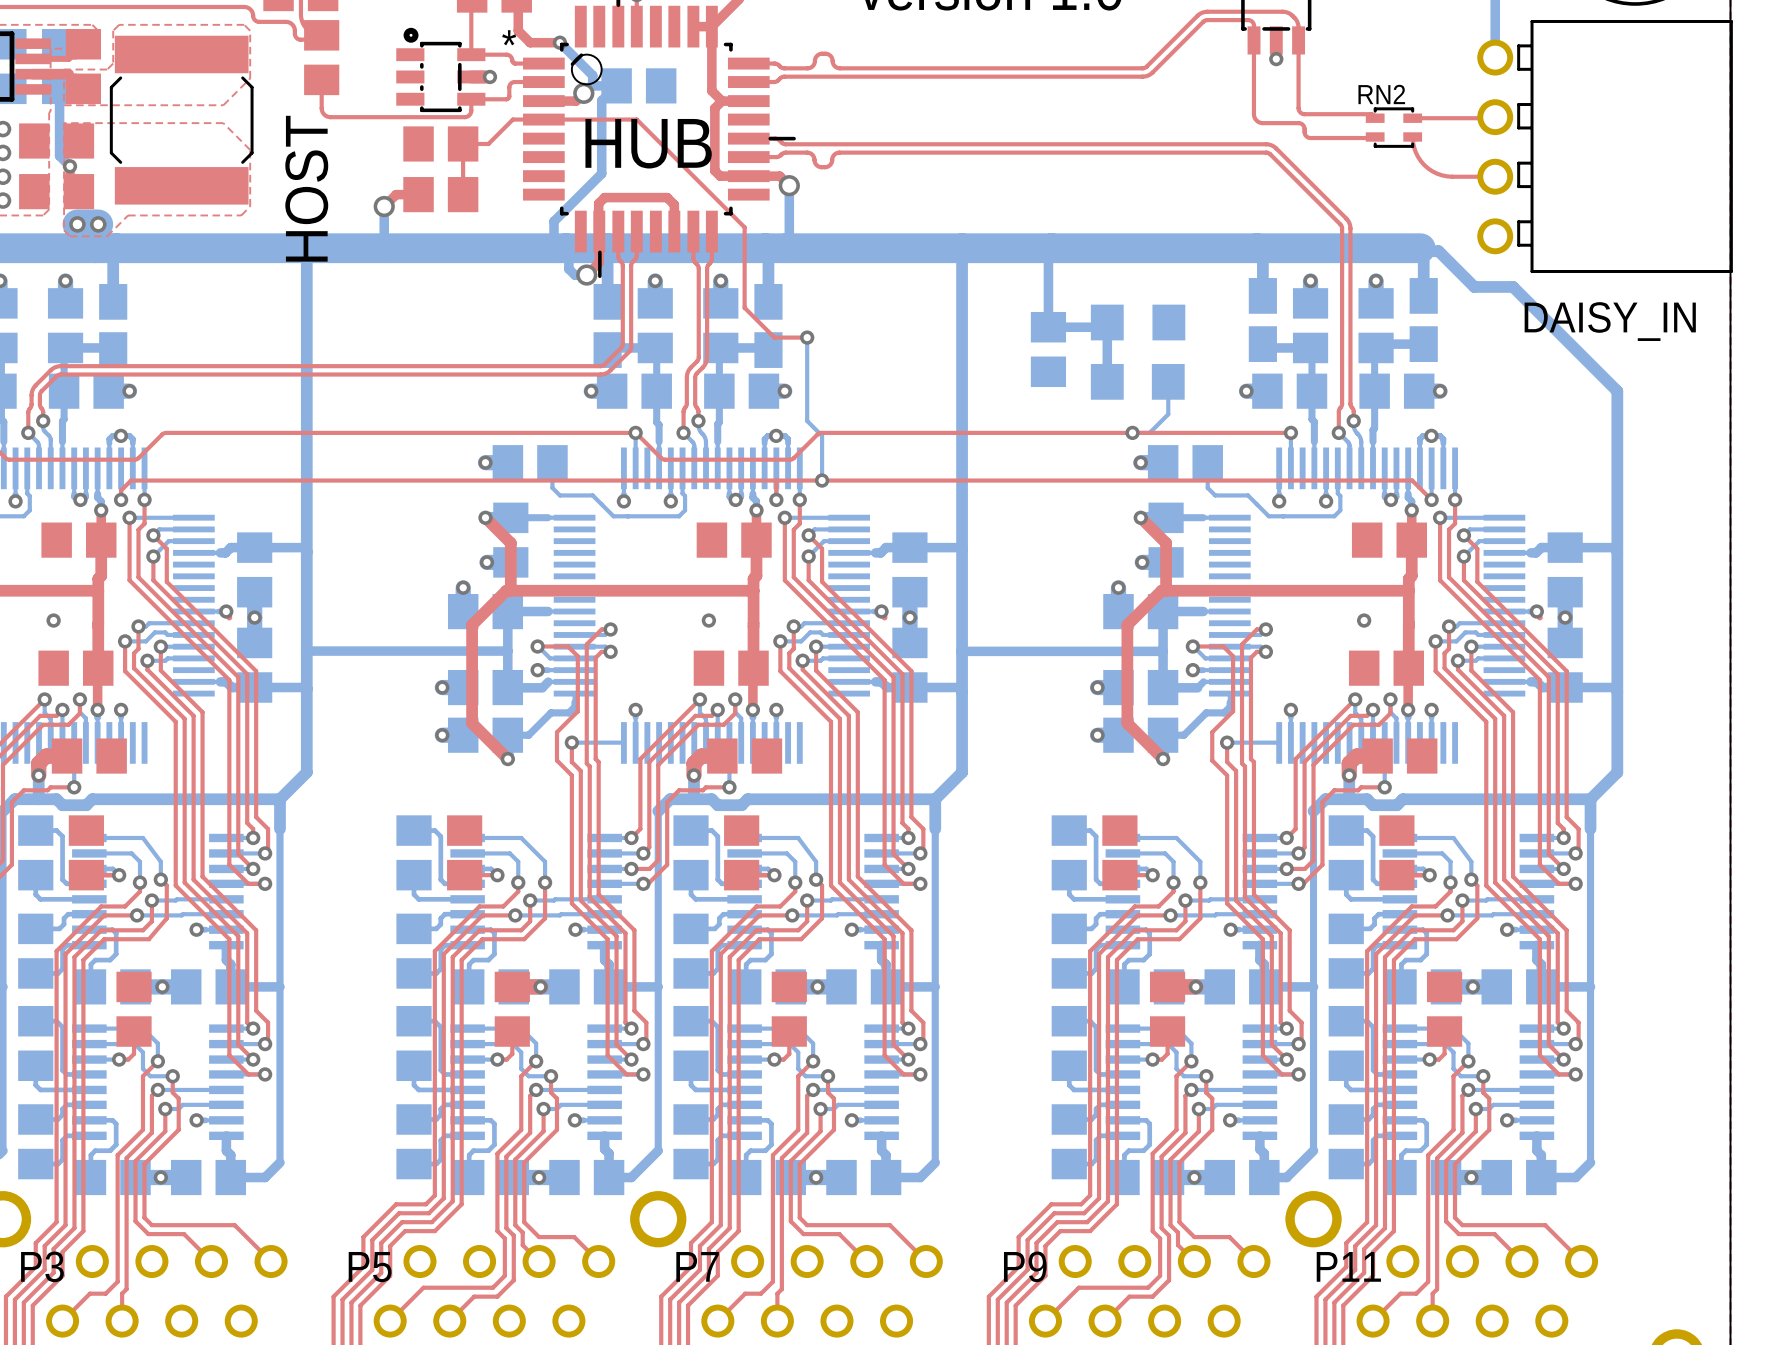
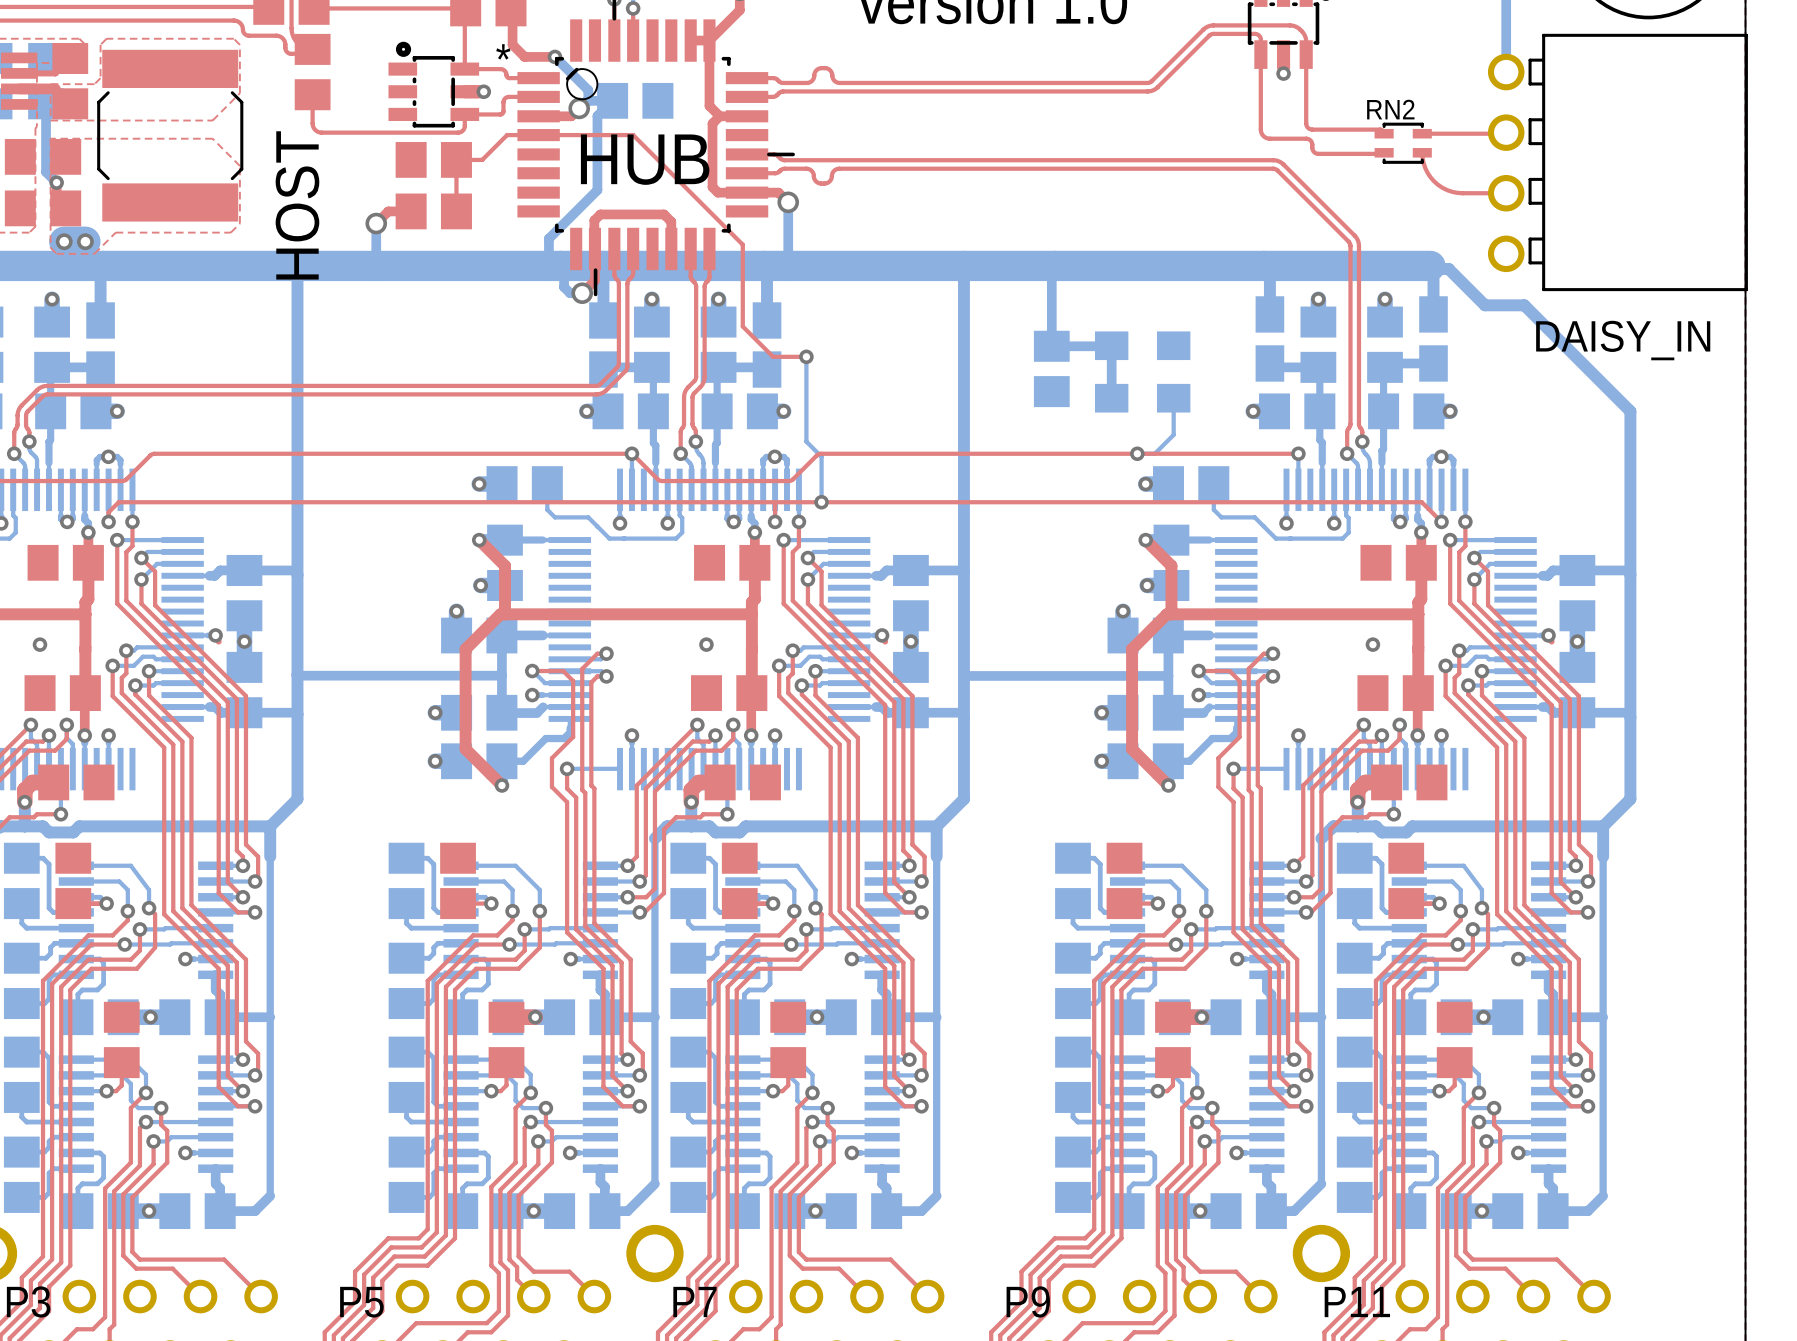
part footprint: [1090, 304, 1186, 400] -> [1094, 331, 1191, 413]

